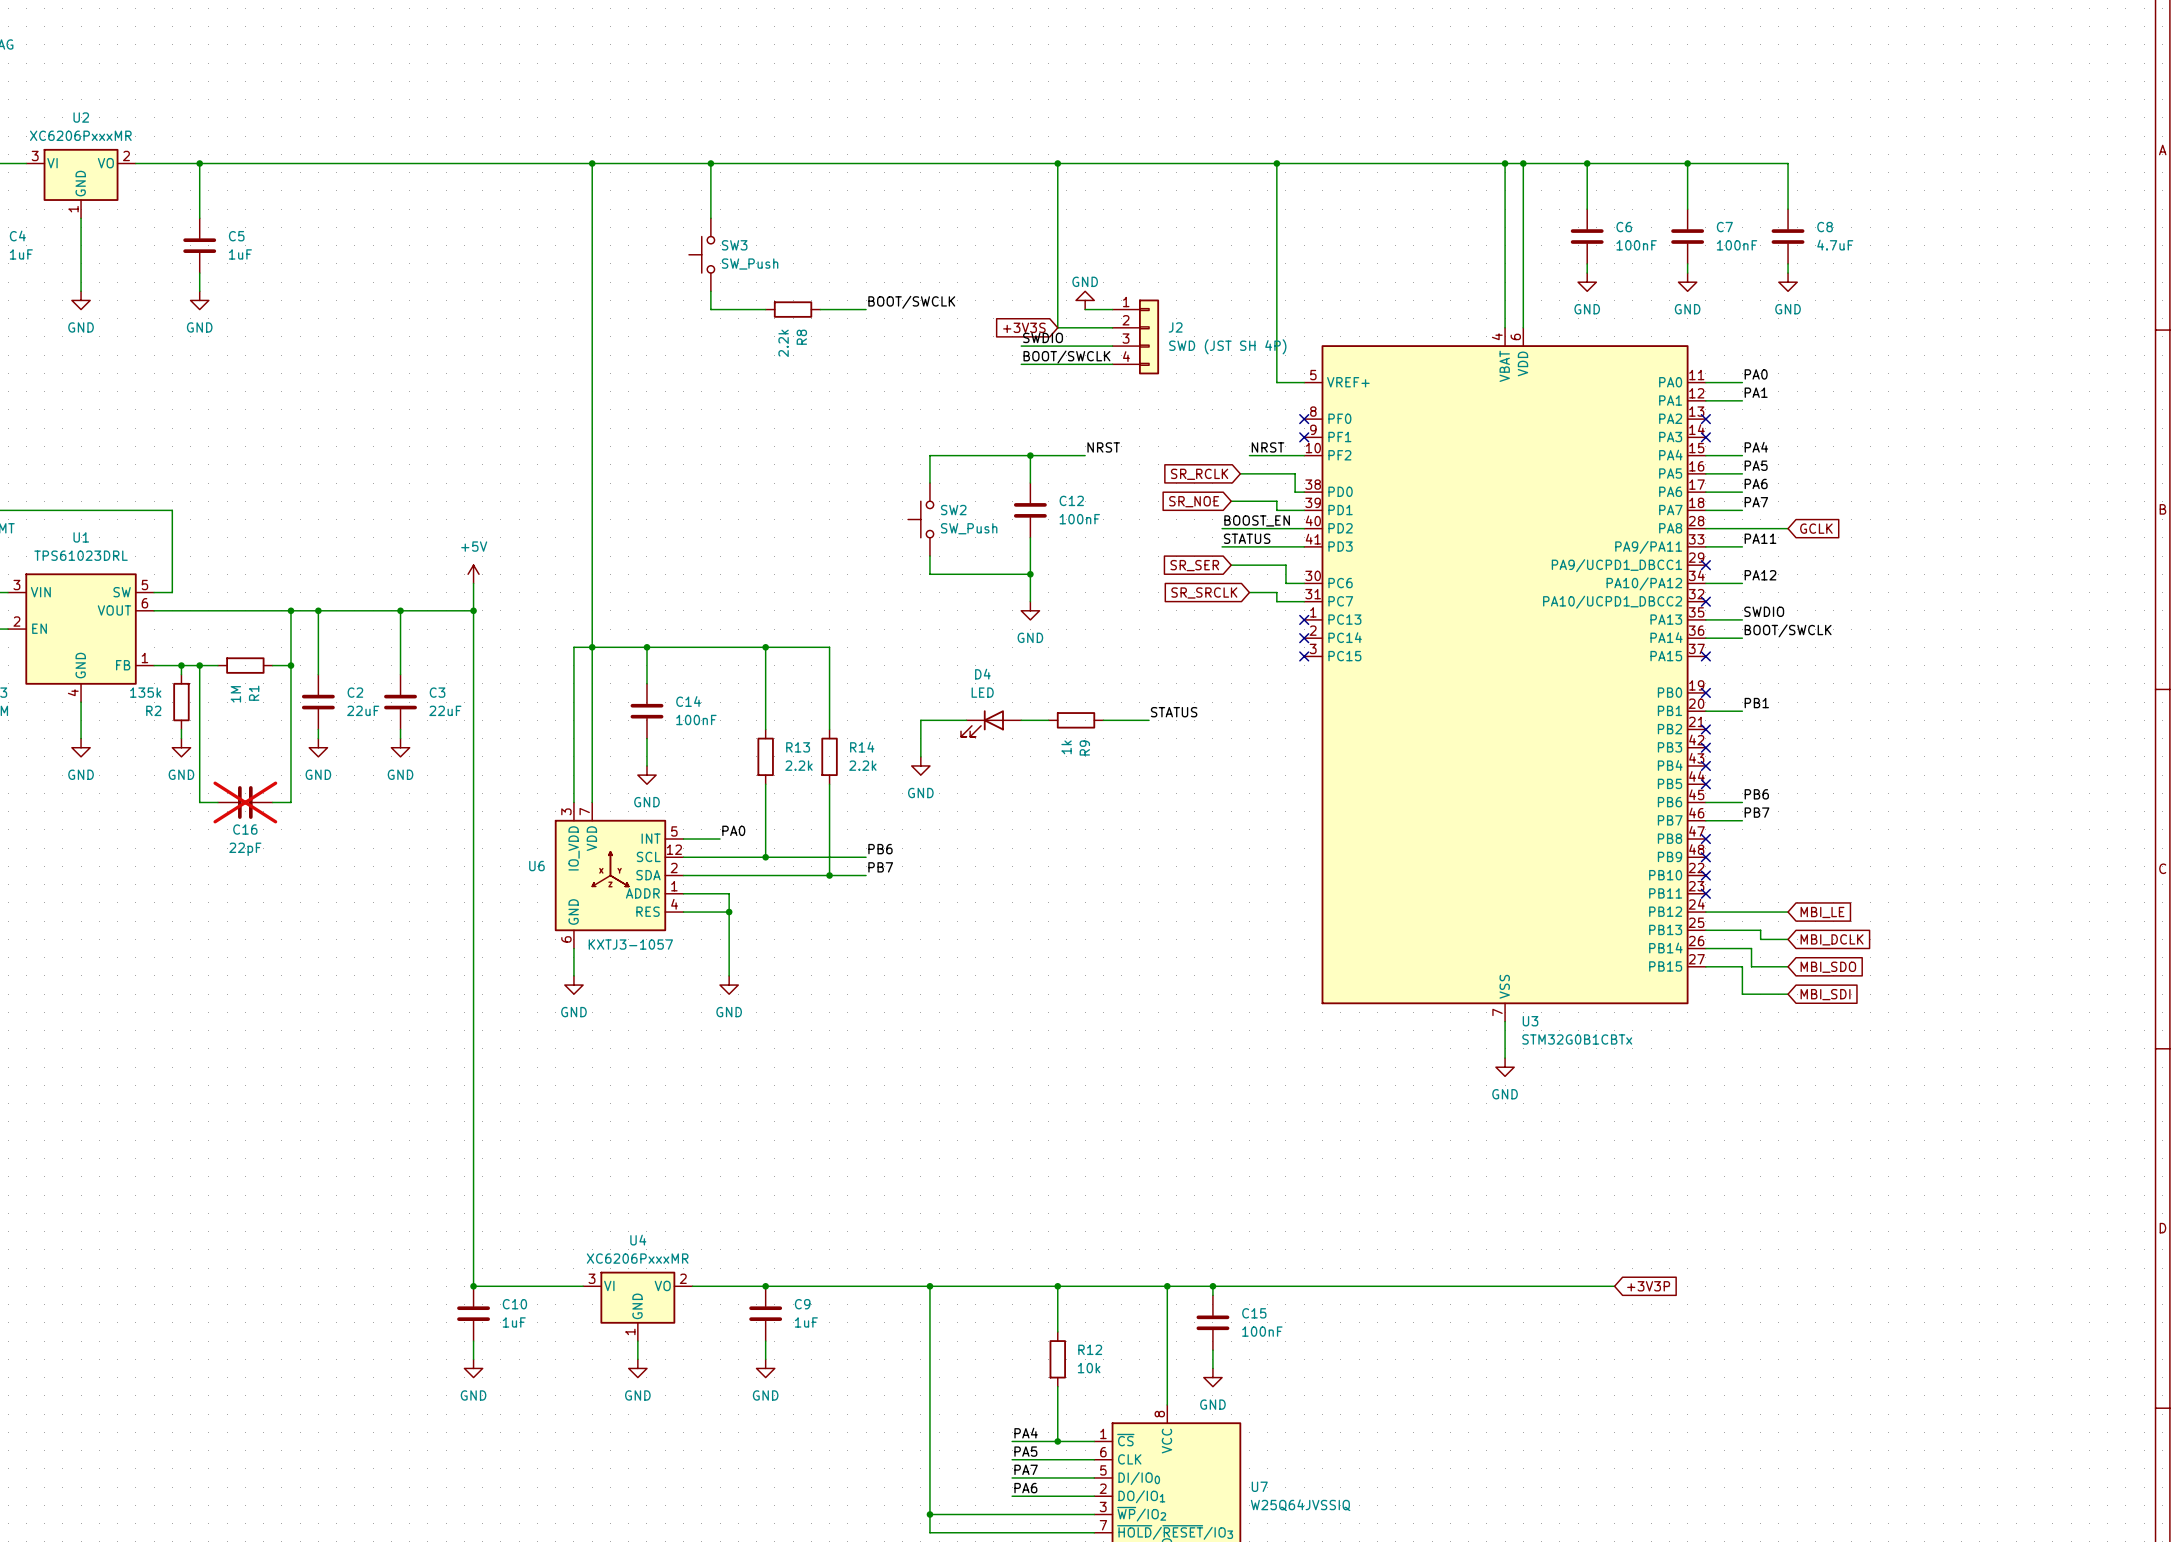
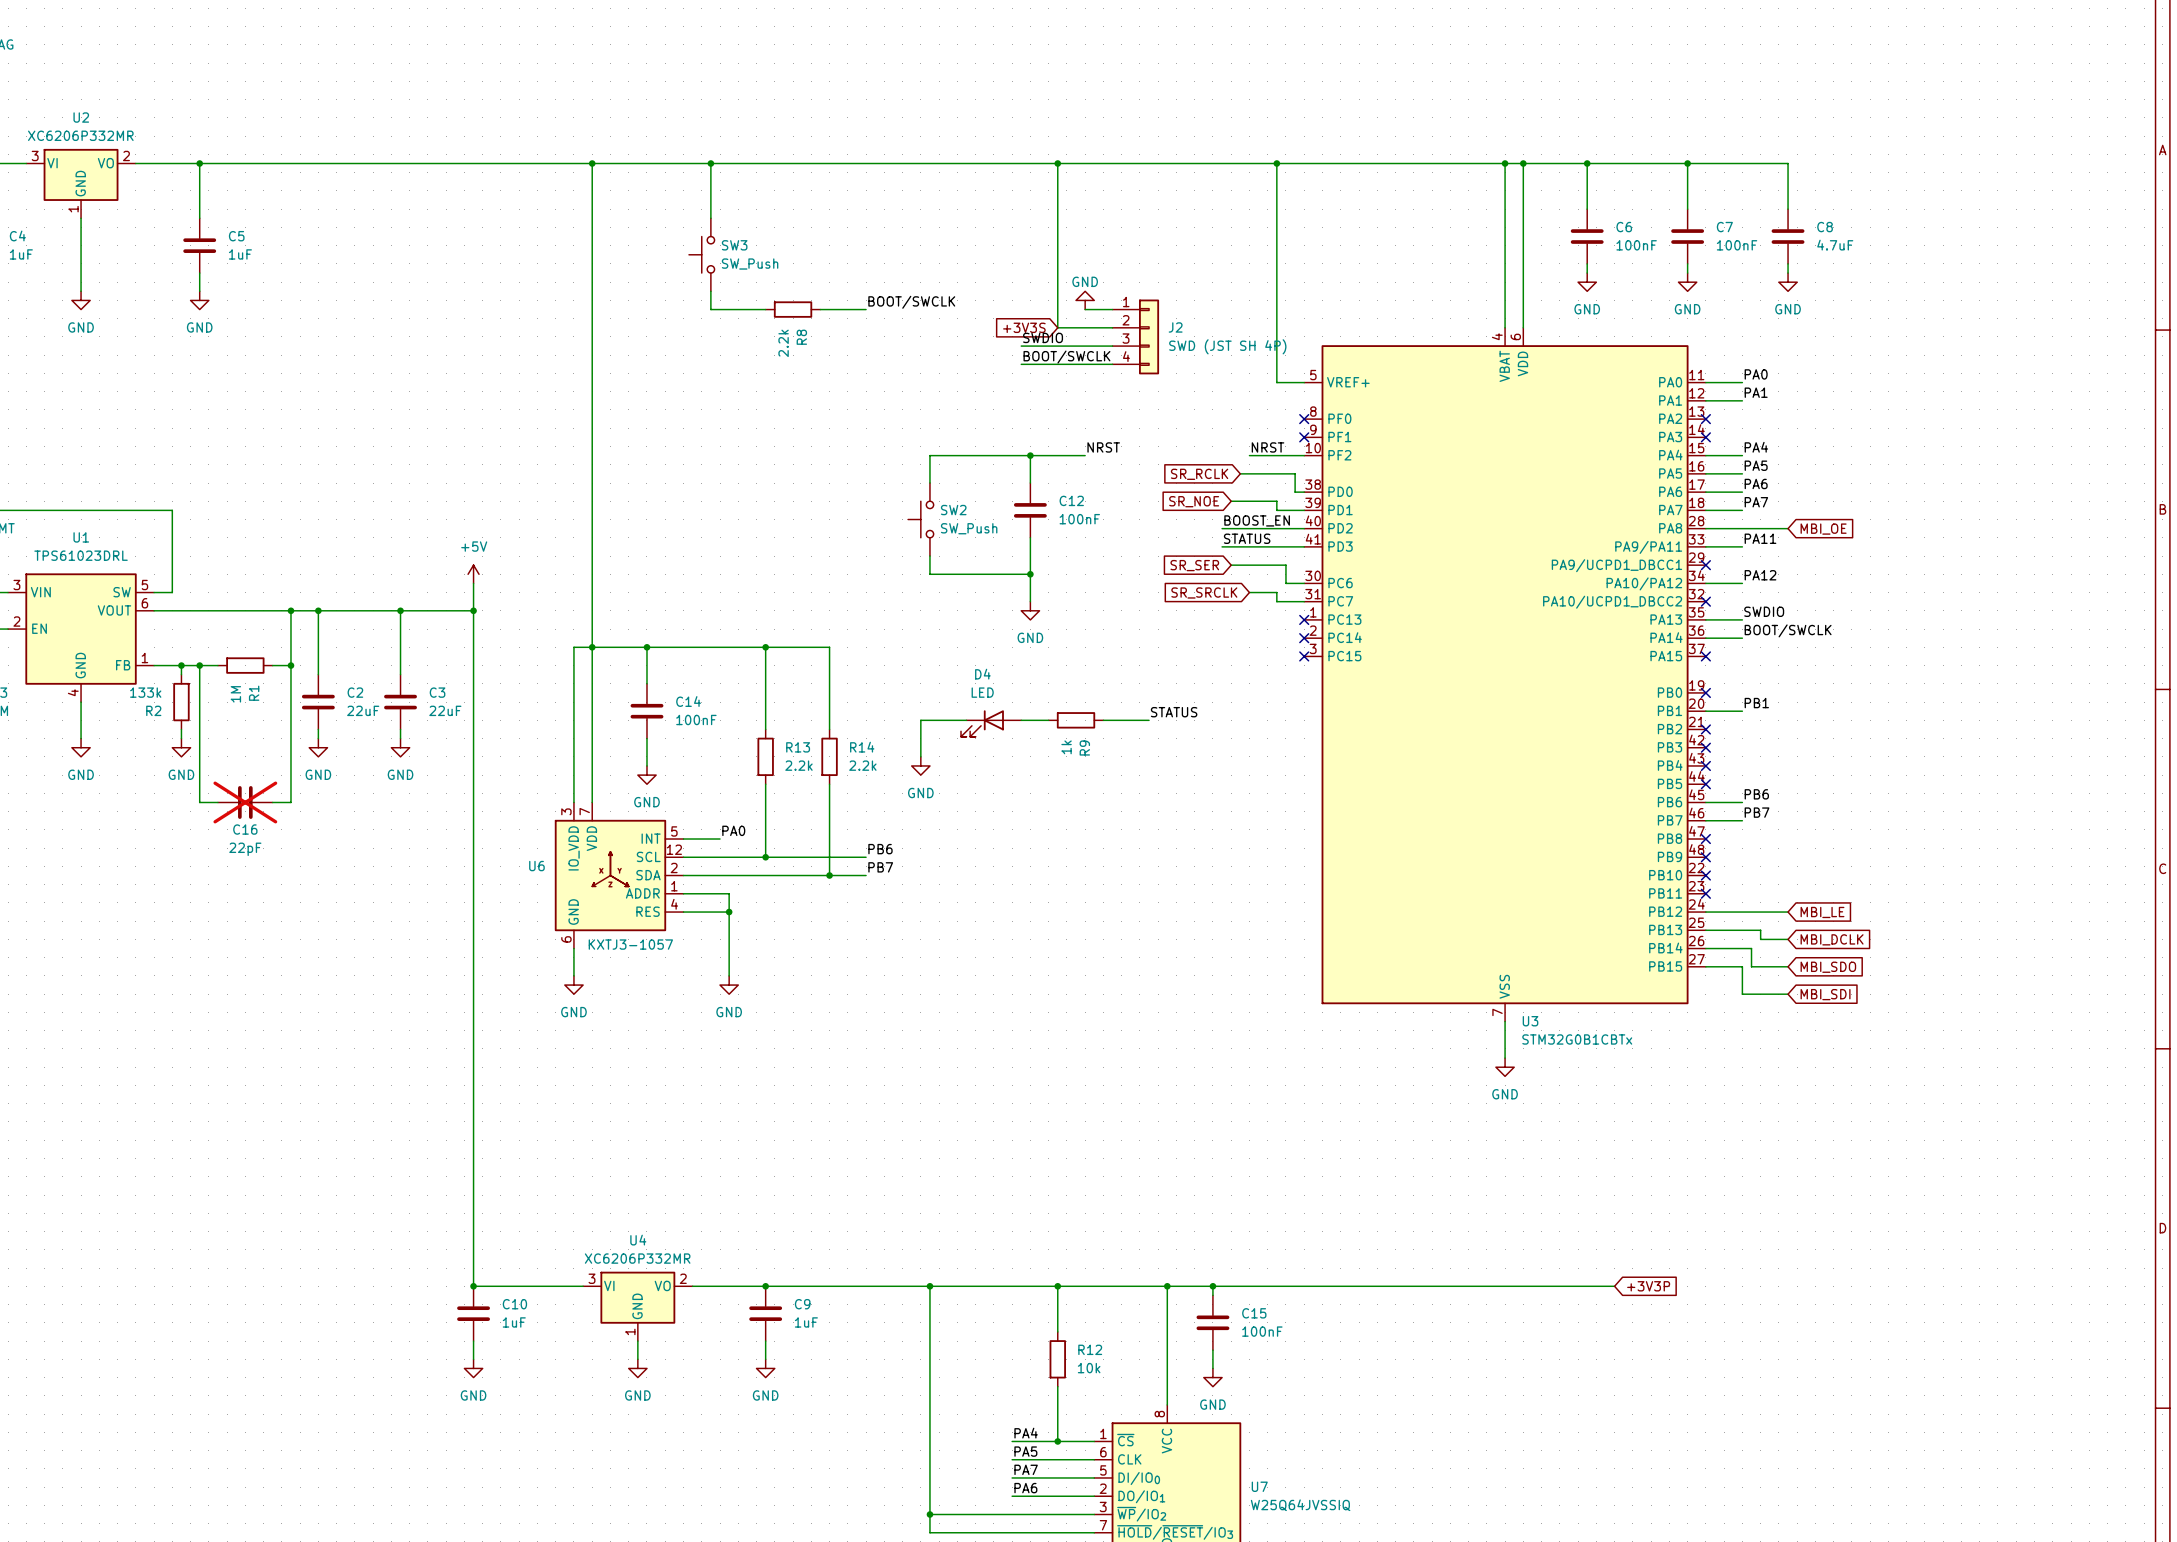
U2 value: XC6206PxxxMR (80, 135) -> XC6206P332MR (80, 135)
global label: GCLK (1816, 528) -> MBI_OE (1823, 529)
R2 value: 135k (145, 692) -> 133k (145, 692)
U4 value: XC6206PxxxMR (637, 1258) -> XC6206P332MR (637, 1258)

